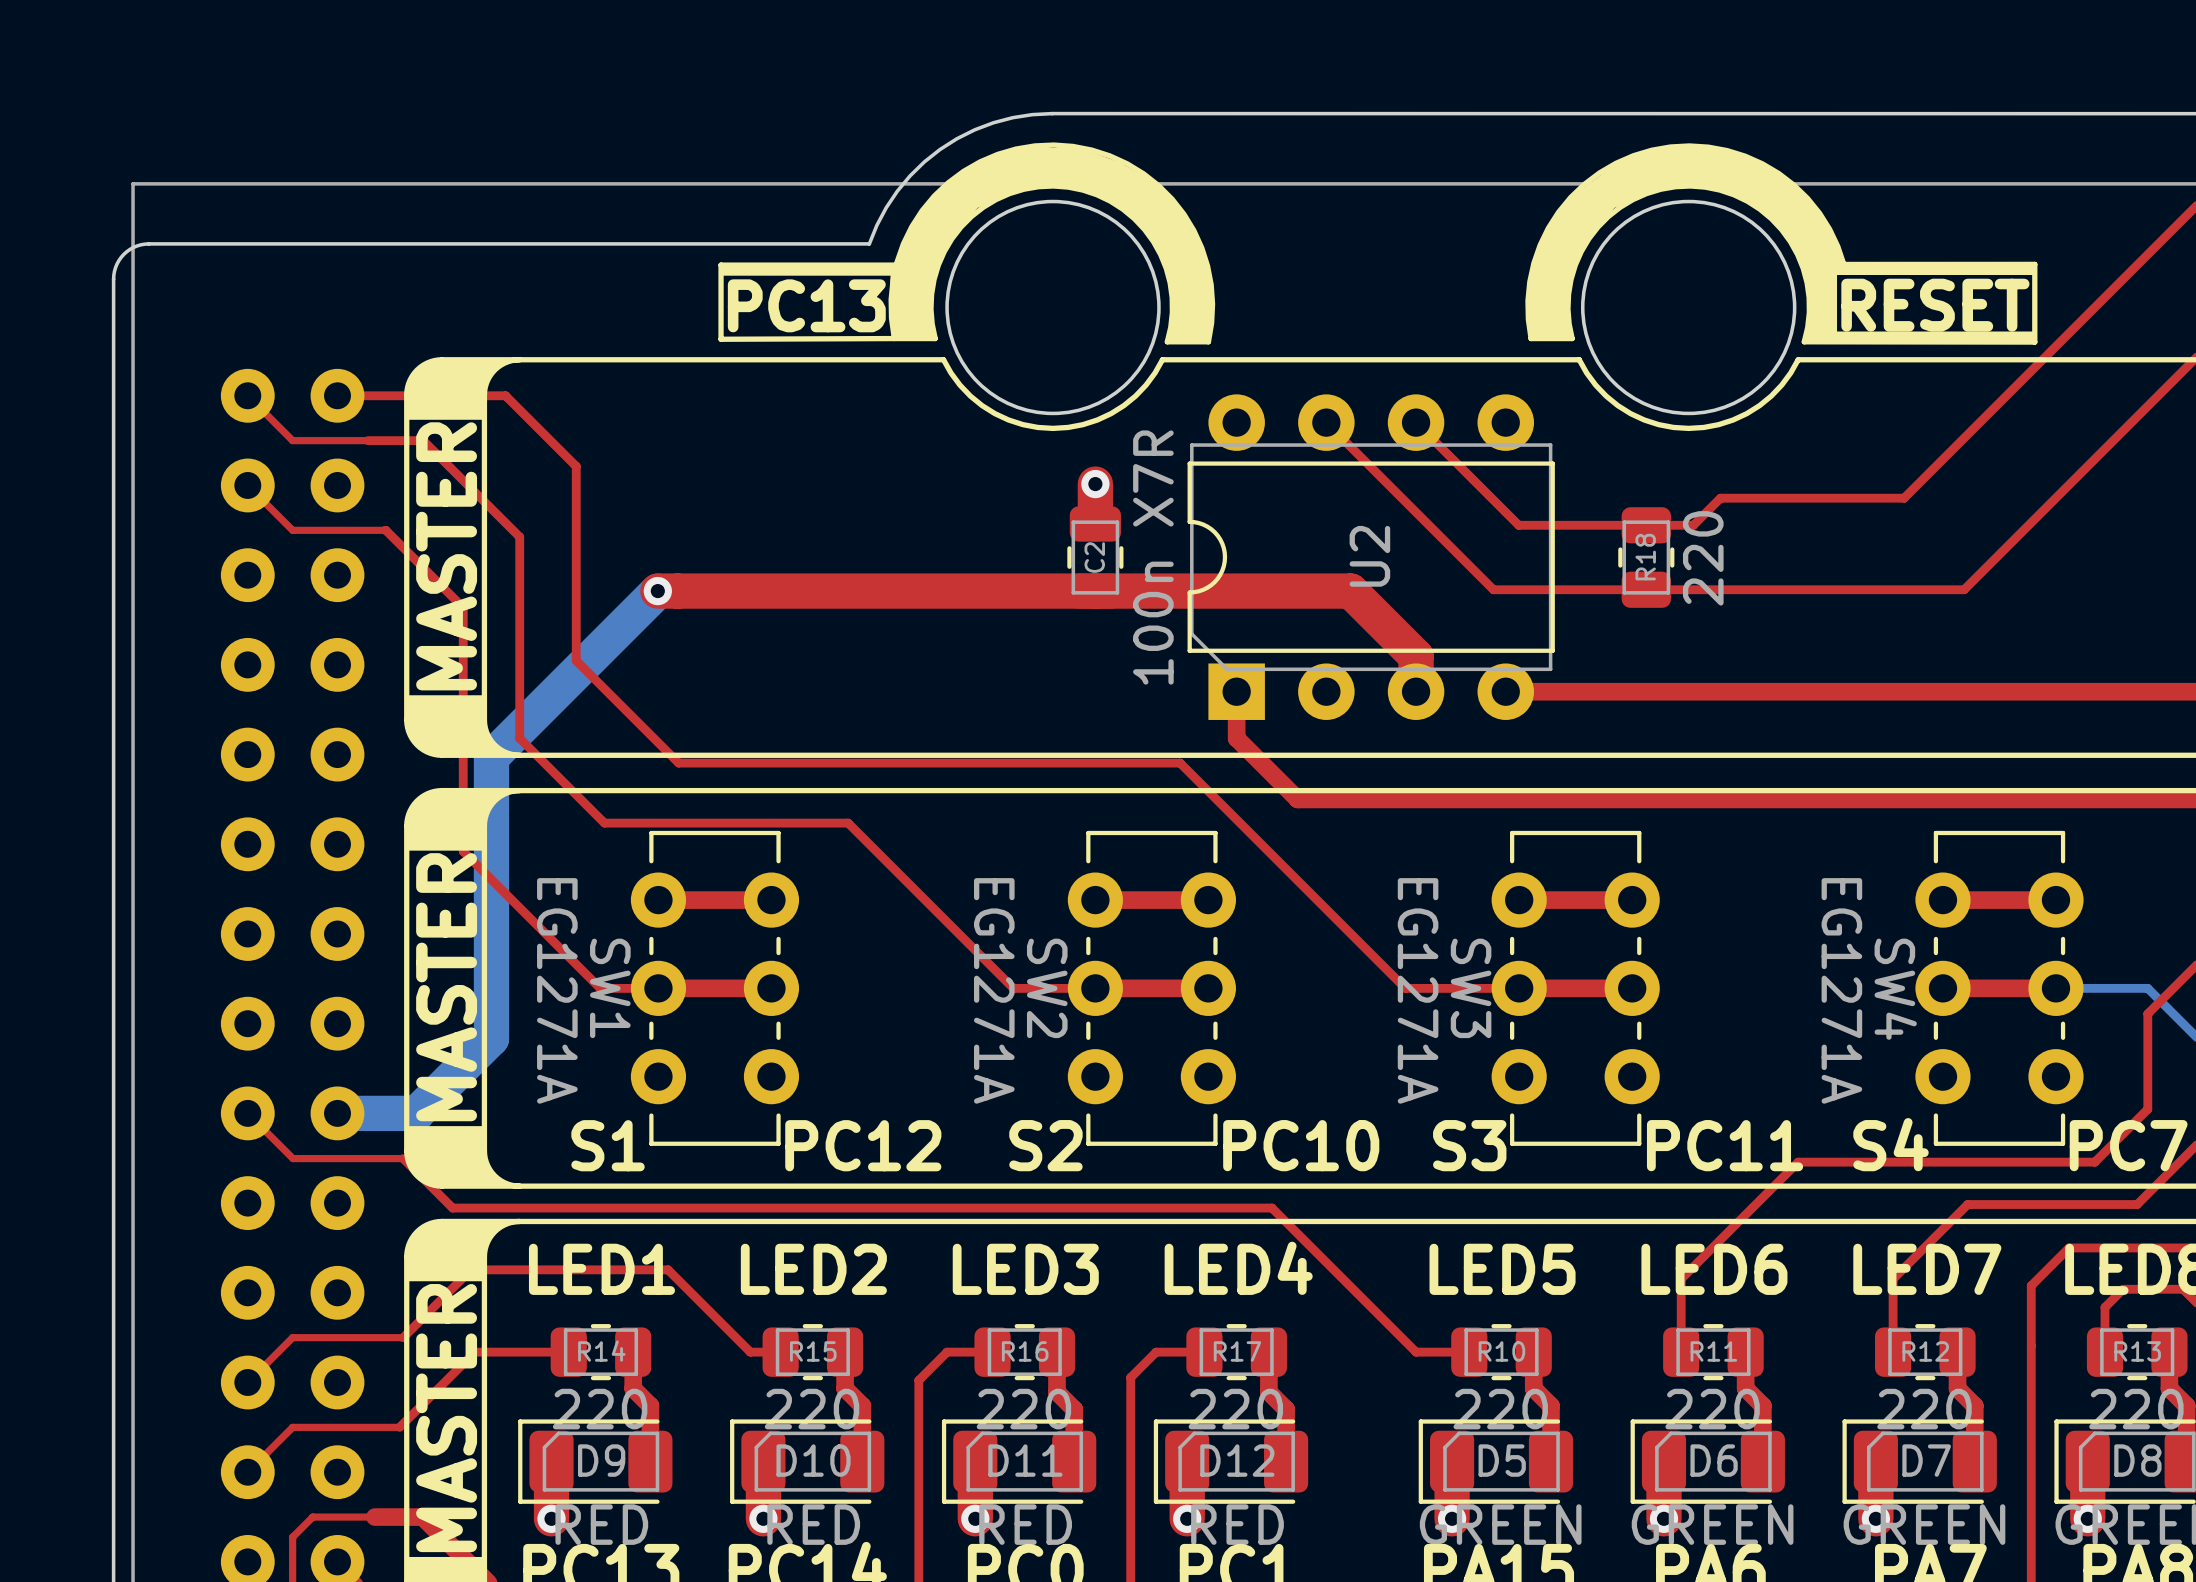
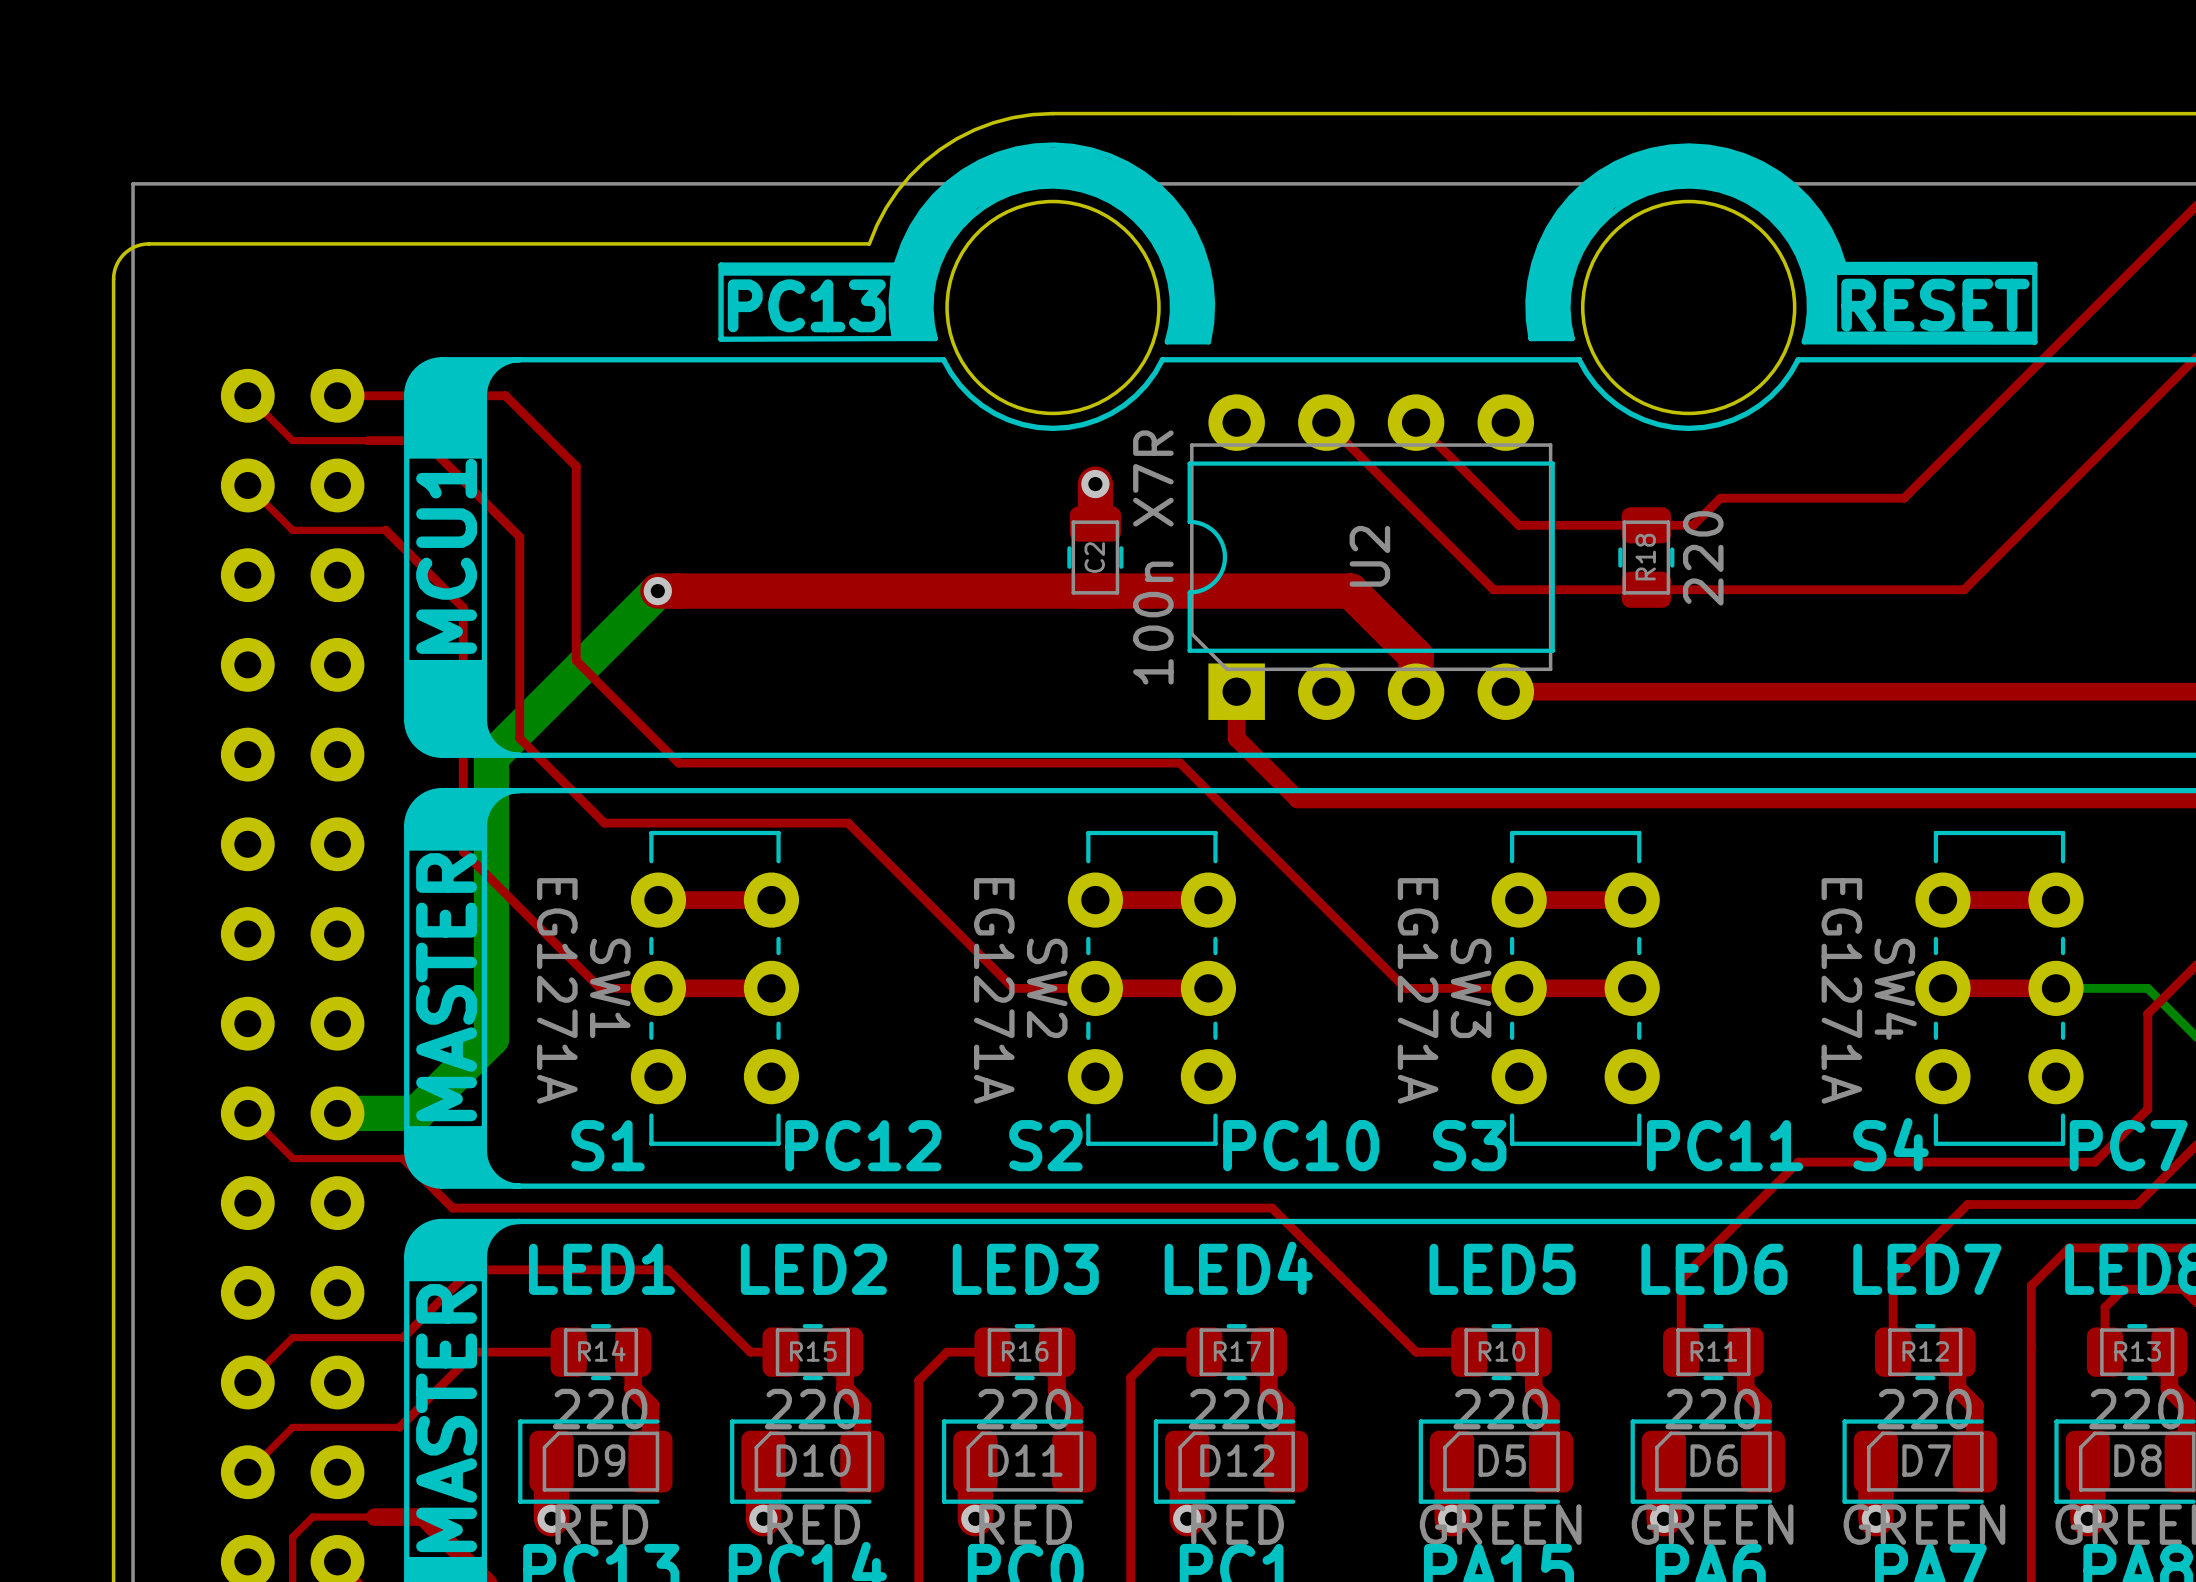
drawing shape: [406, 359, 506, 420] -> [406, 359, 506, 459]
text: MASTER (446, 556) -> MCU1 (446, 556)
drawing shape: [406, 695, 513, 756] -> [406, 659, 513, 756]

